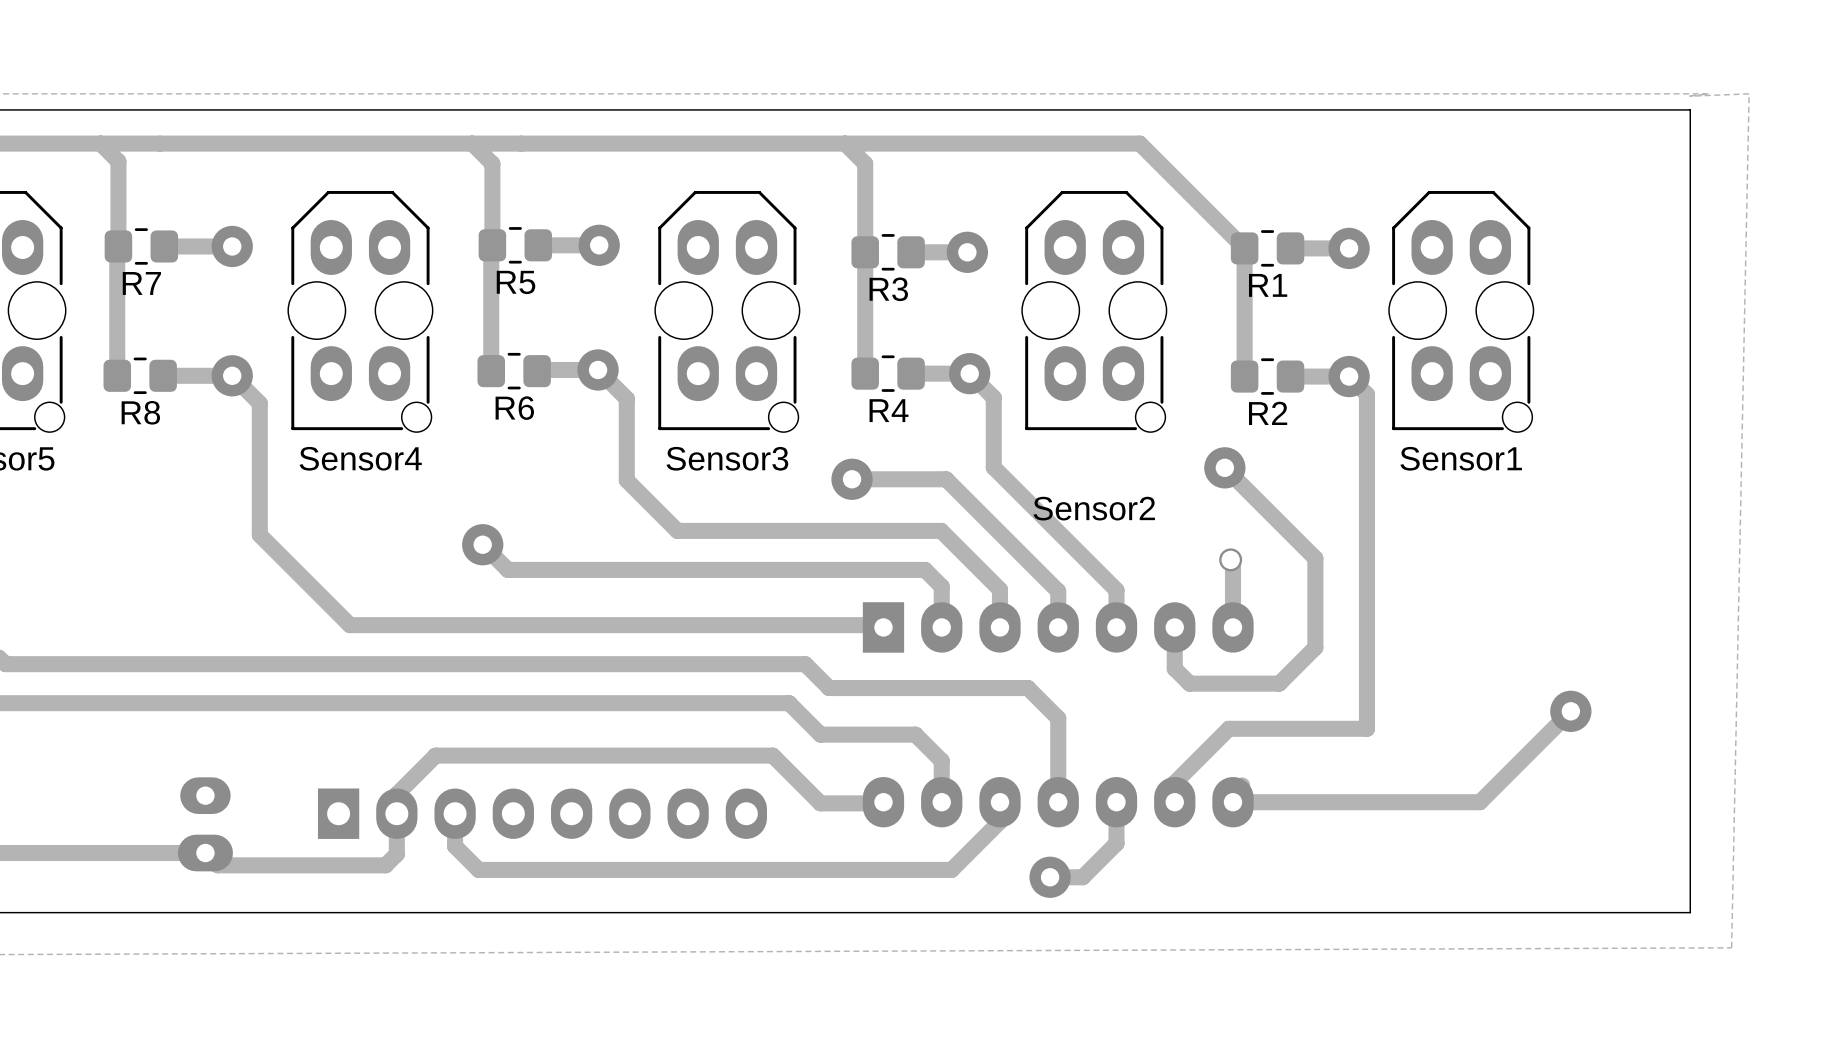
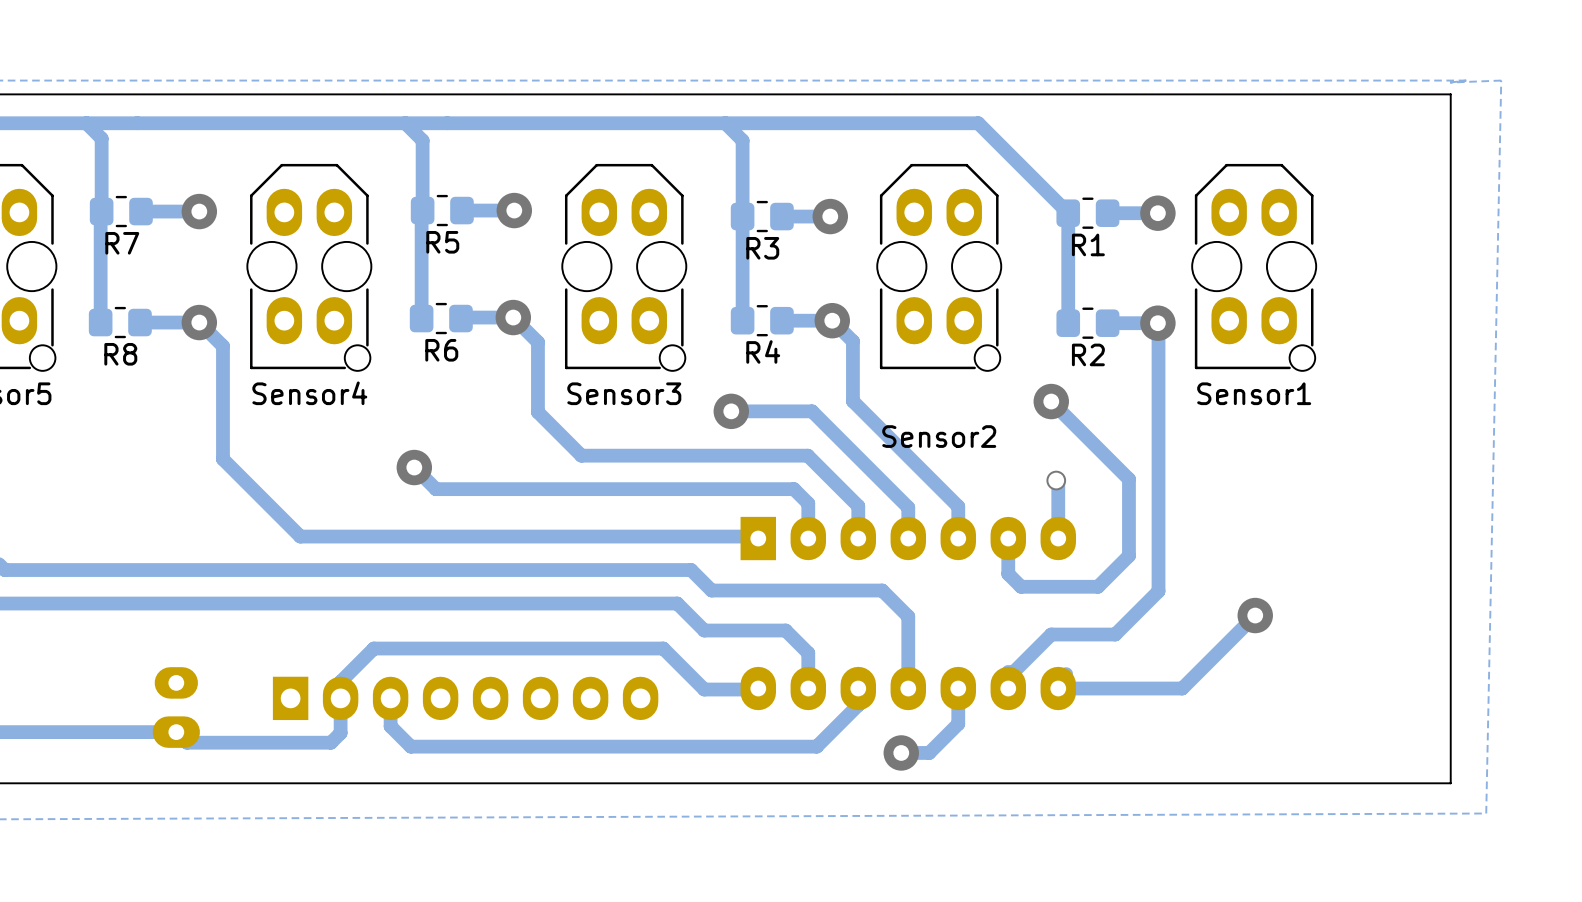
track: (1349, 377) (1366, 394) (1366, 728) (1228, 728) (1174, 782) -> (1158, 323) (1158, 591) (1115, 634) (1051, 634) (1008, 677)
track: (1570, 711) (1479, 802) (1377, 802) -> (1255, 615) (1182, 688)
via position: (1570, 711) -> (1255, 615)

